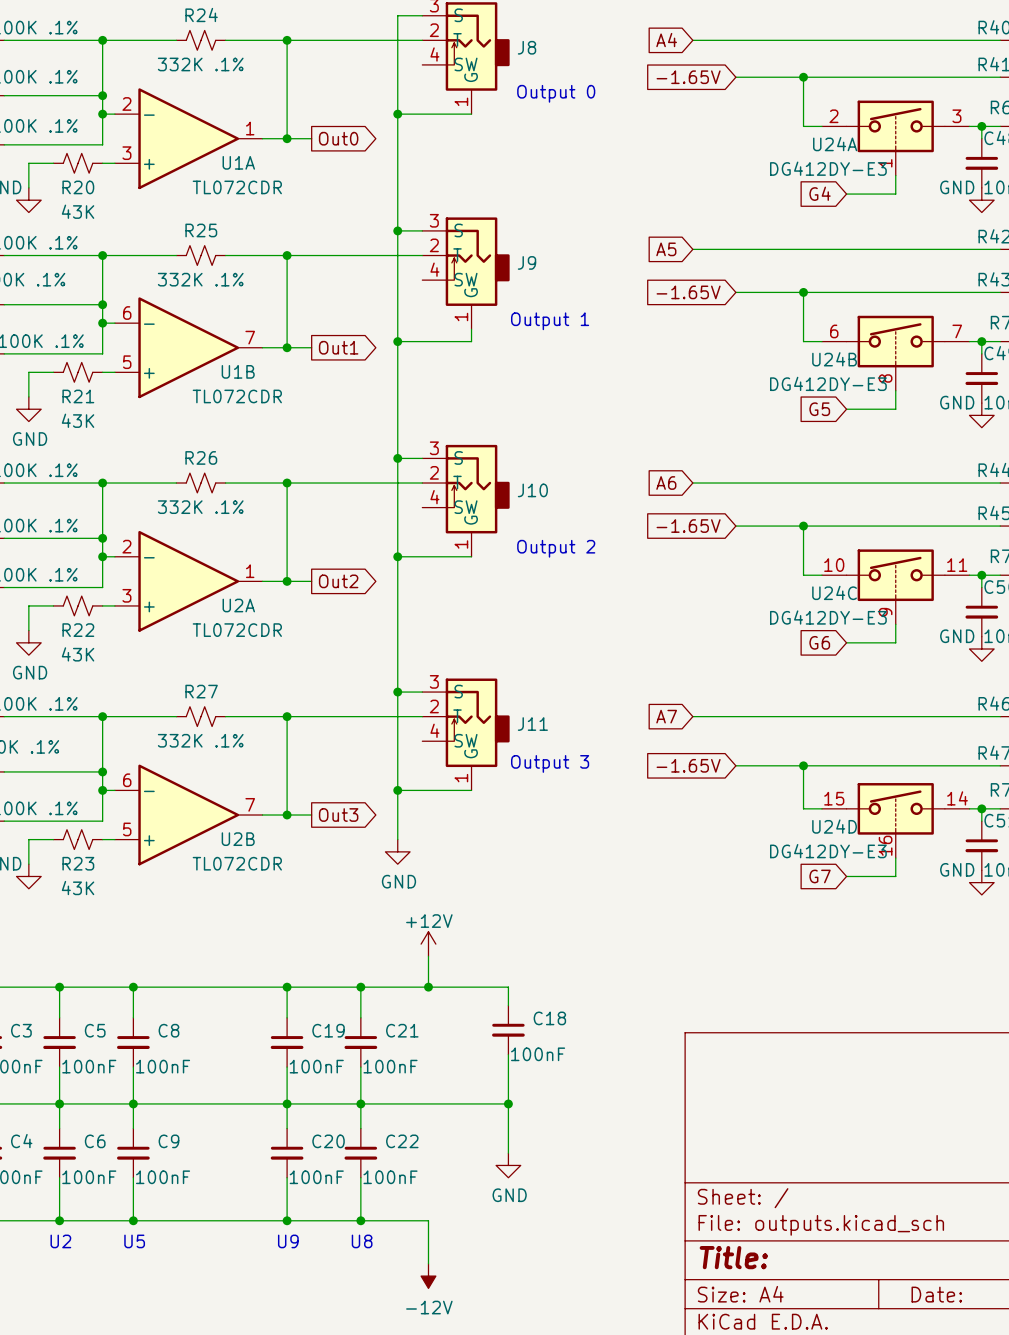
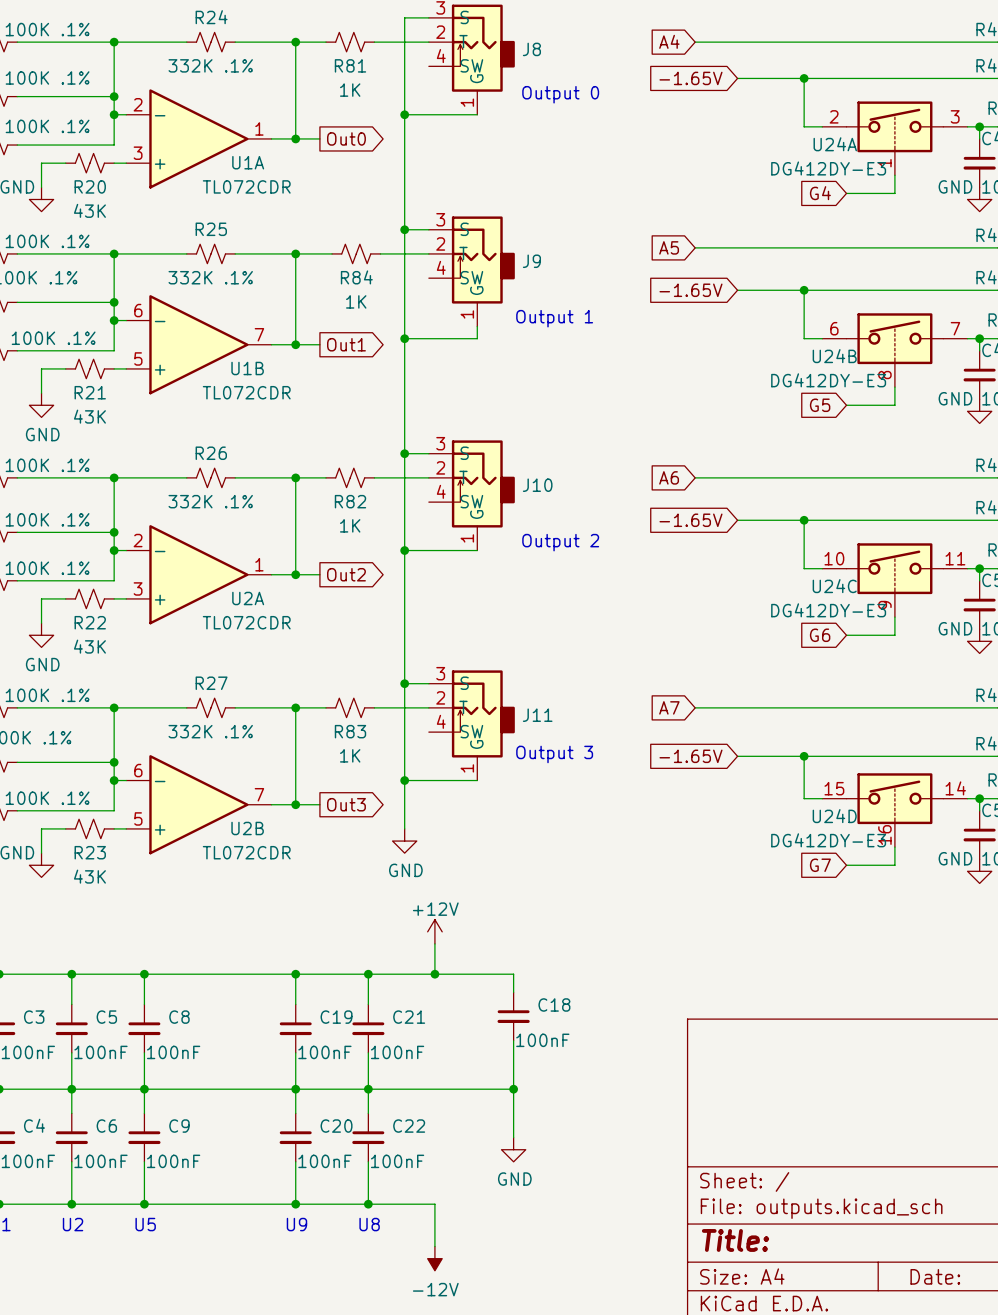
R81: none -> 1K (350, 42)
R84: none -> 1K (356, 253)
R82: none -> 1K (350, 477)
R83: none -> 1K (350, 707)

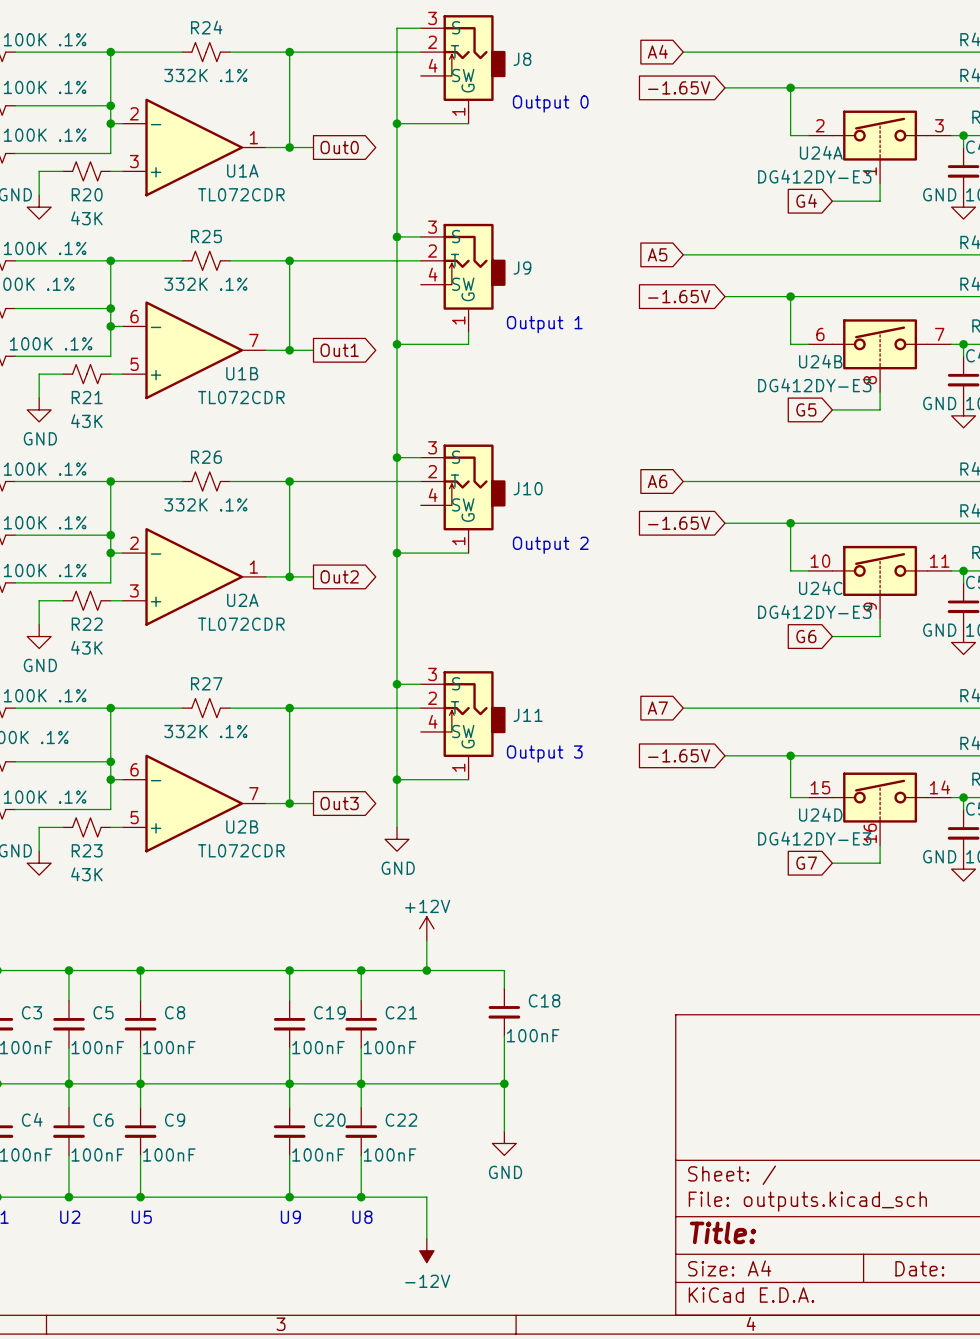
R81: 1K (350, 42) -> none
R84: 1K (356, 253) -> none
R82: 1K (350, 477) -> none
R83: 1K (350, 707) -> none

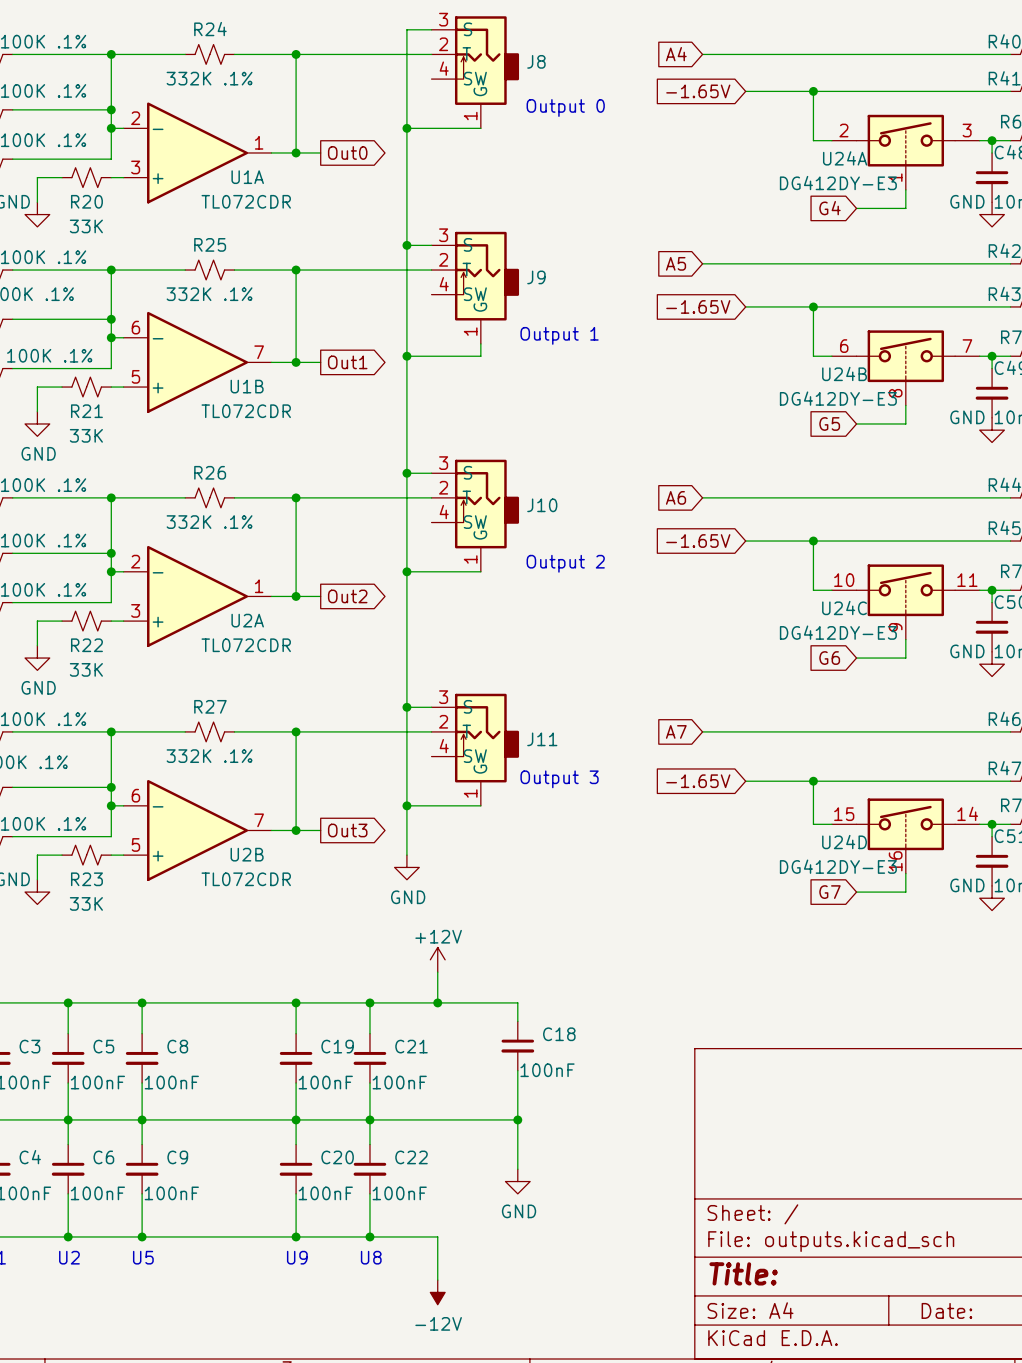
R20 value: 43K (86, 218) -> 33K (86, 226)
R21 value: 43K (86, 421) -> 33K (86, 435)
R22 value: 43K (86, 647) -> 33K (86, 669)
R23 value: 43K (86, 874) -> 33K (86, 903)

